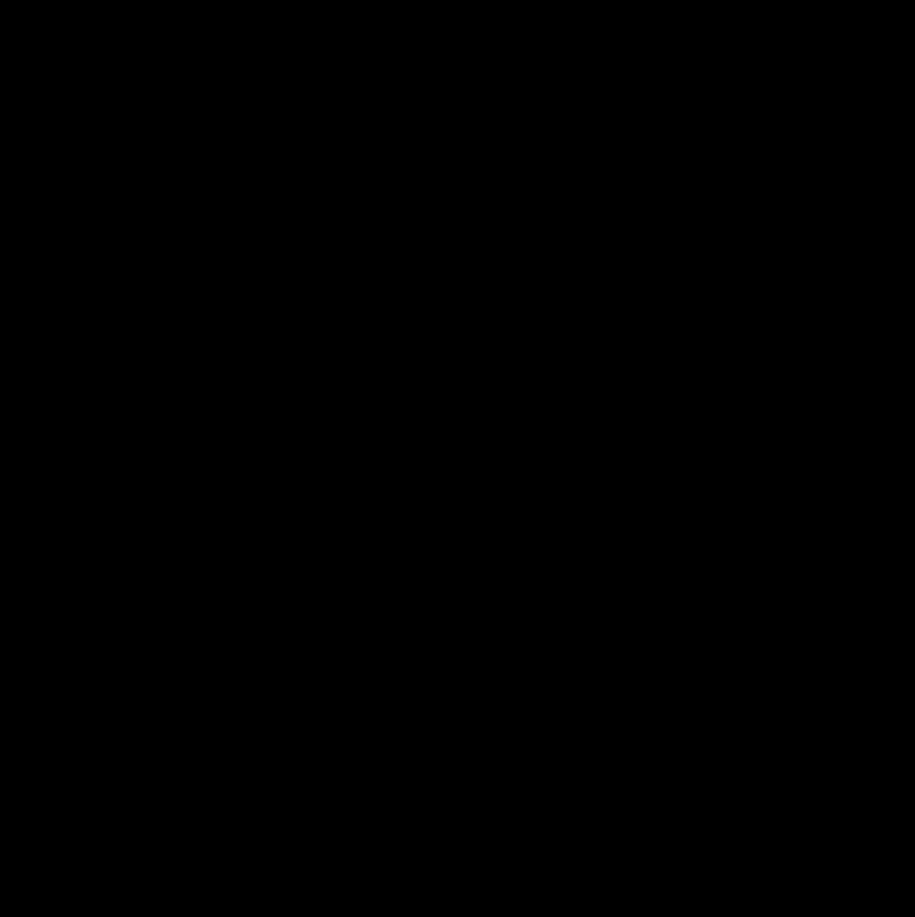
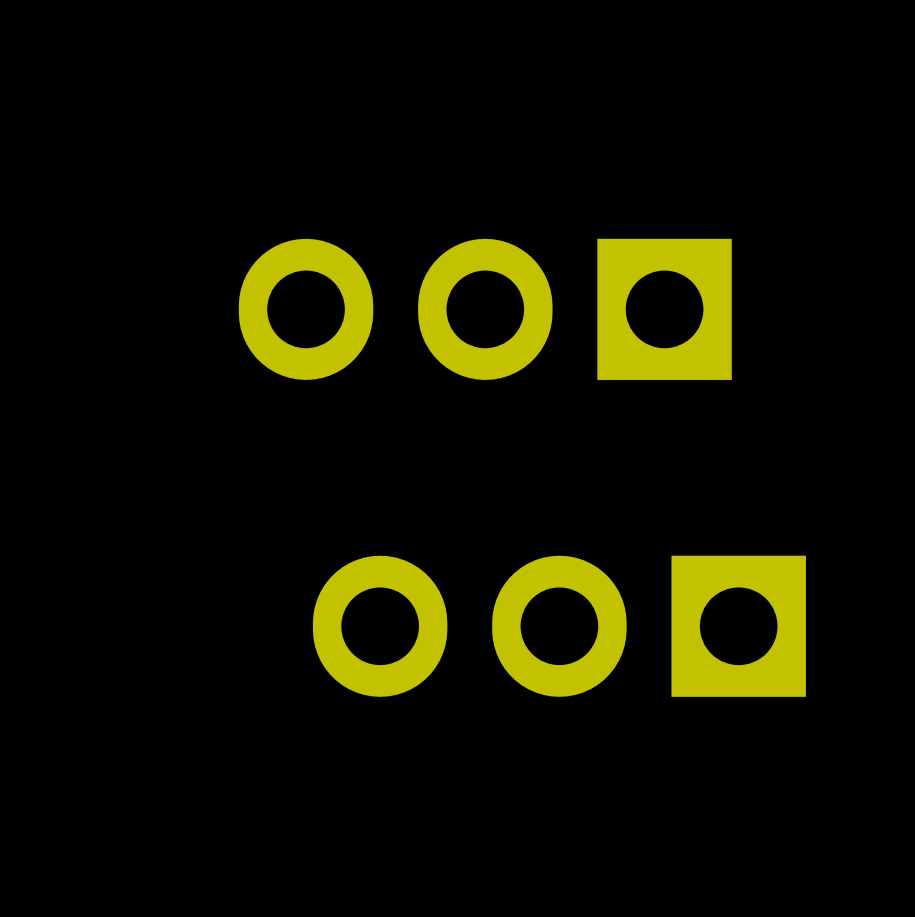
part: none -> (485, 309)
part: none -> (559, 626)

